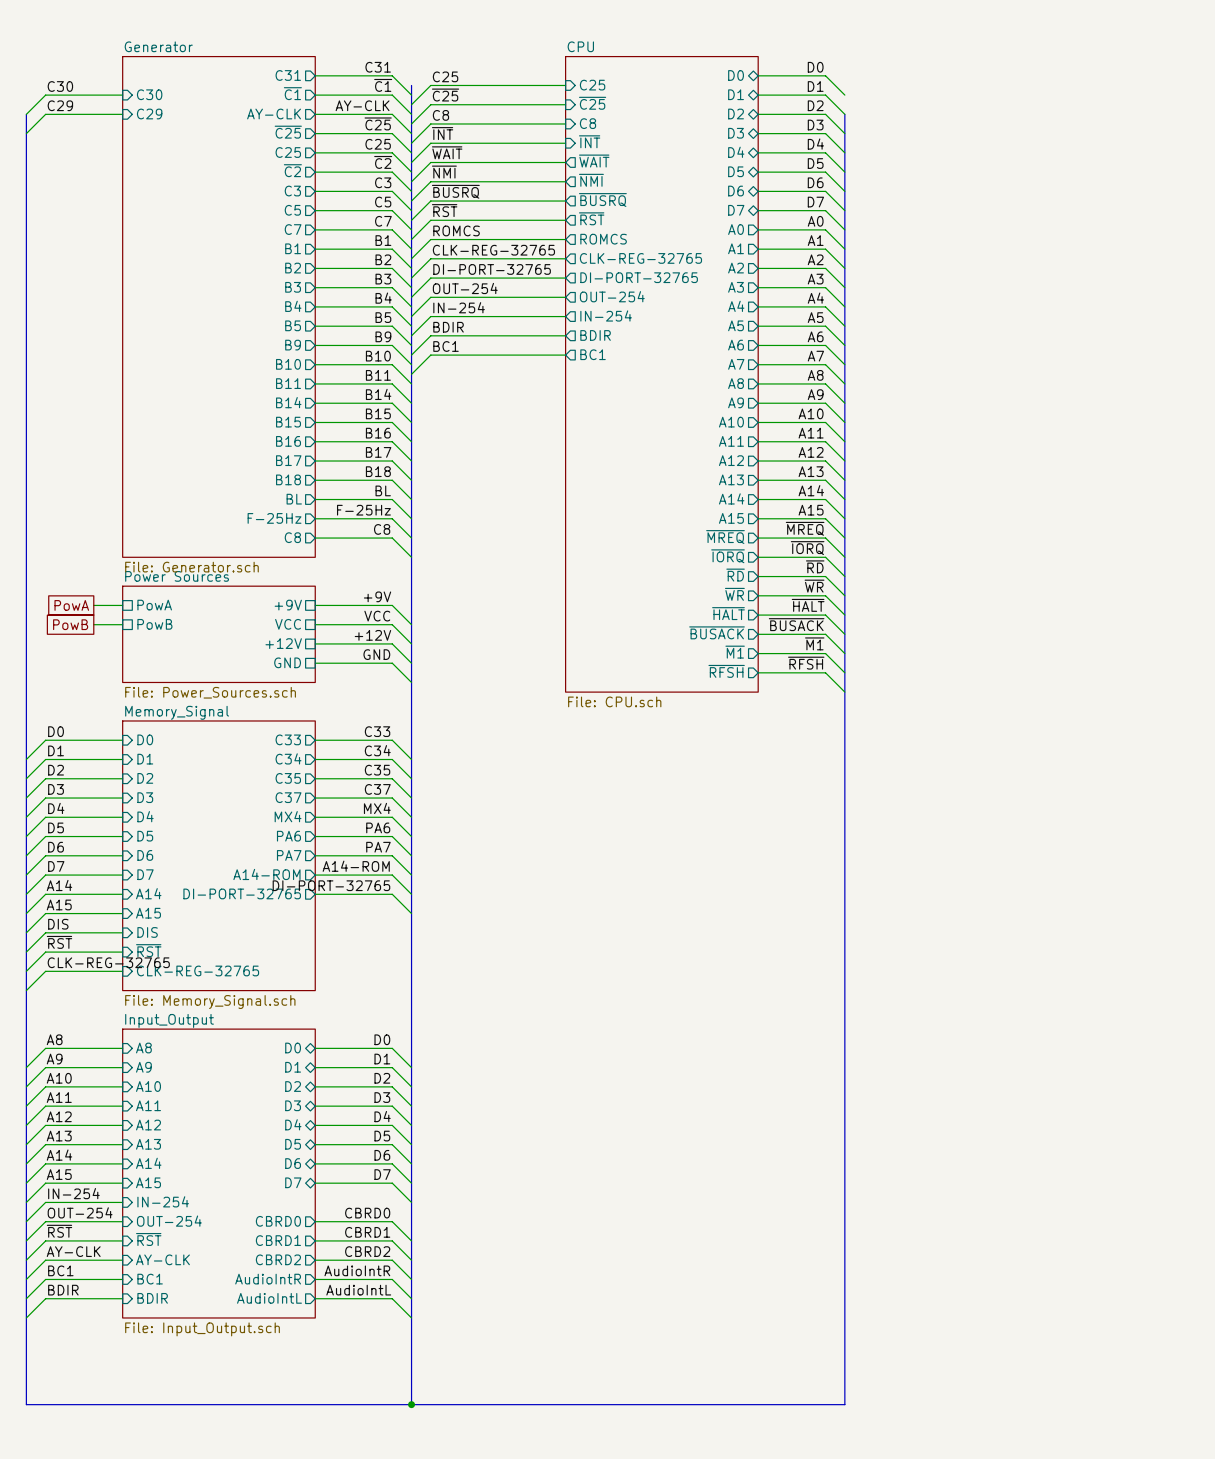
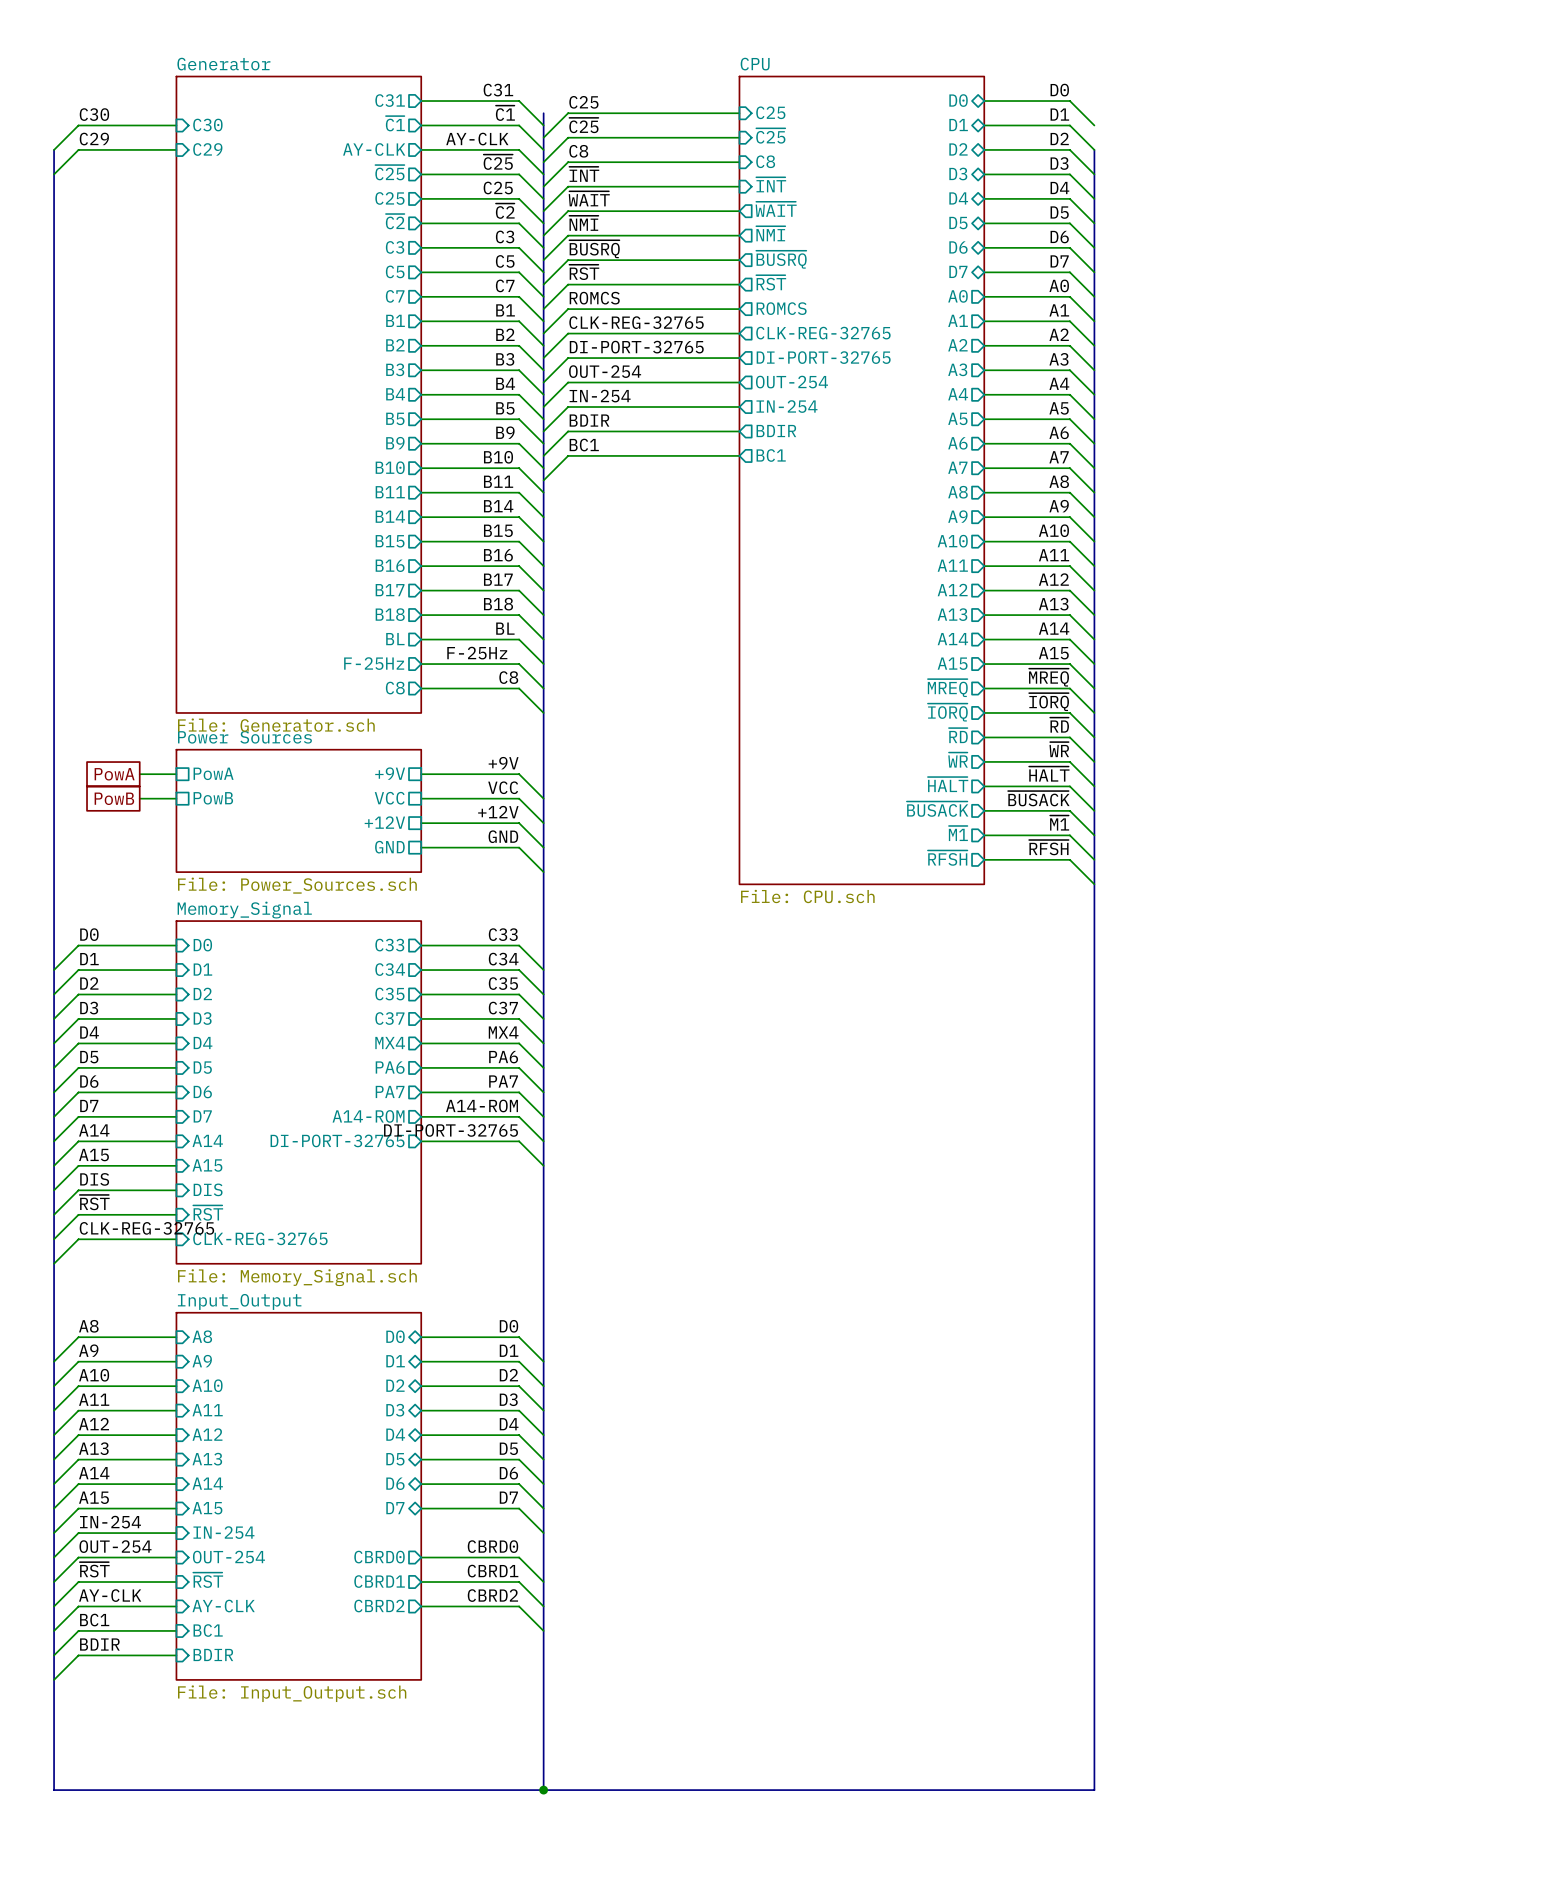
label: AudioIntR (357, 1270) -> none
sheet pin: AudioIntR (268, 1279) -> none
wire: (315, 1279) (392, 1279) (411, 1298) -> none
label: AudioIntL (358, 1290) -> none
sheet pin: AudioIntL (269, 1298) -> none
wire: (315, 1298) (392, 1298) (411, 1317) -> none

